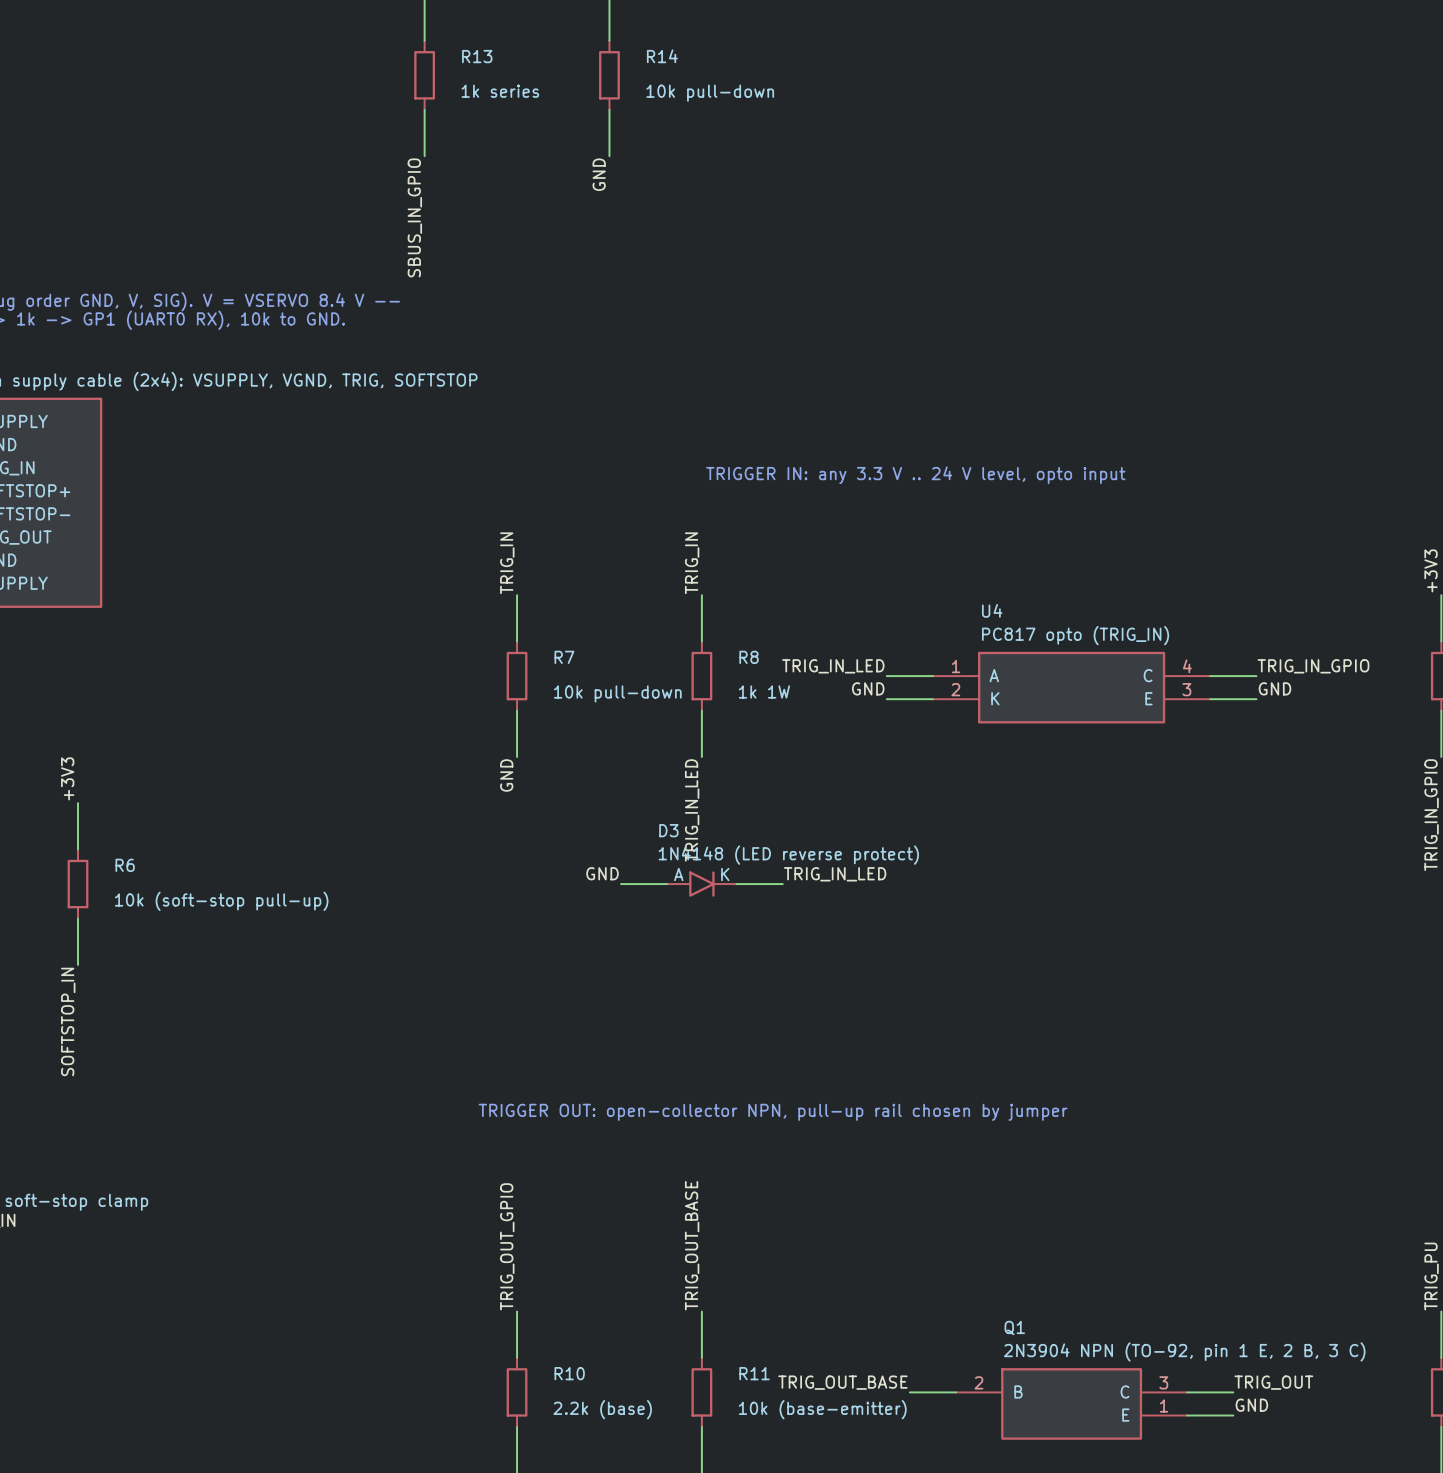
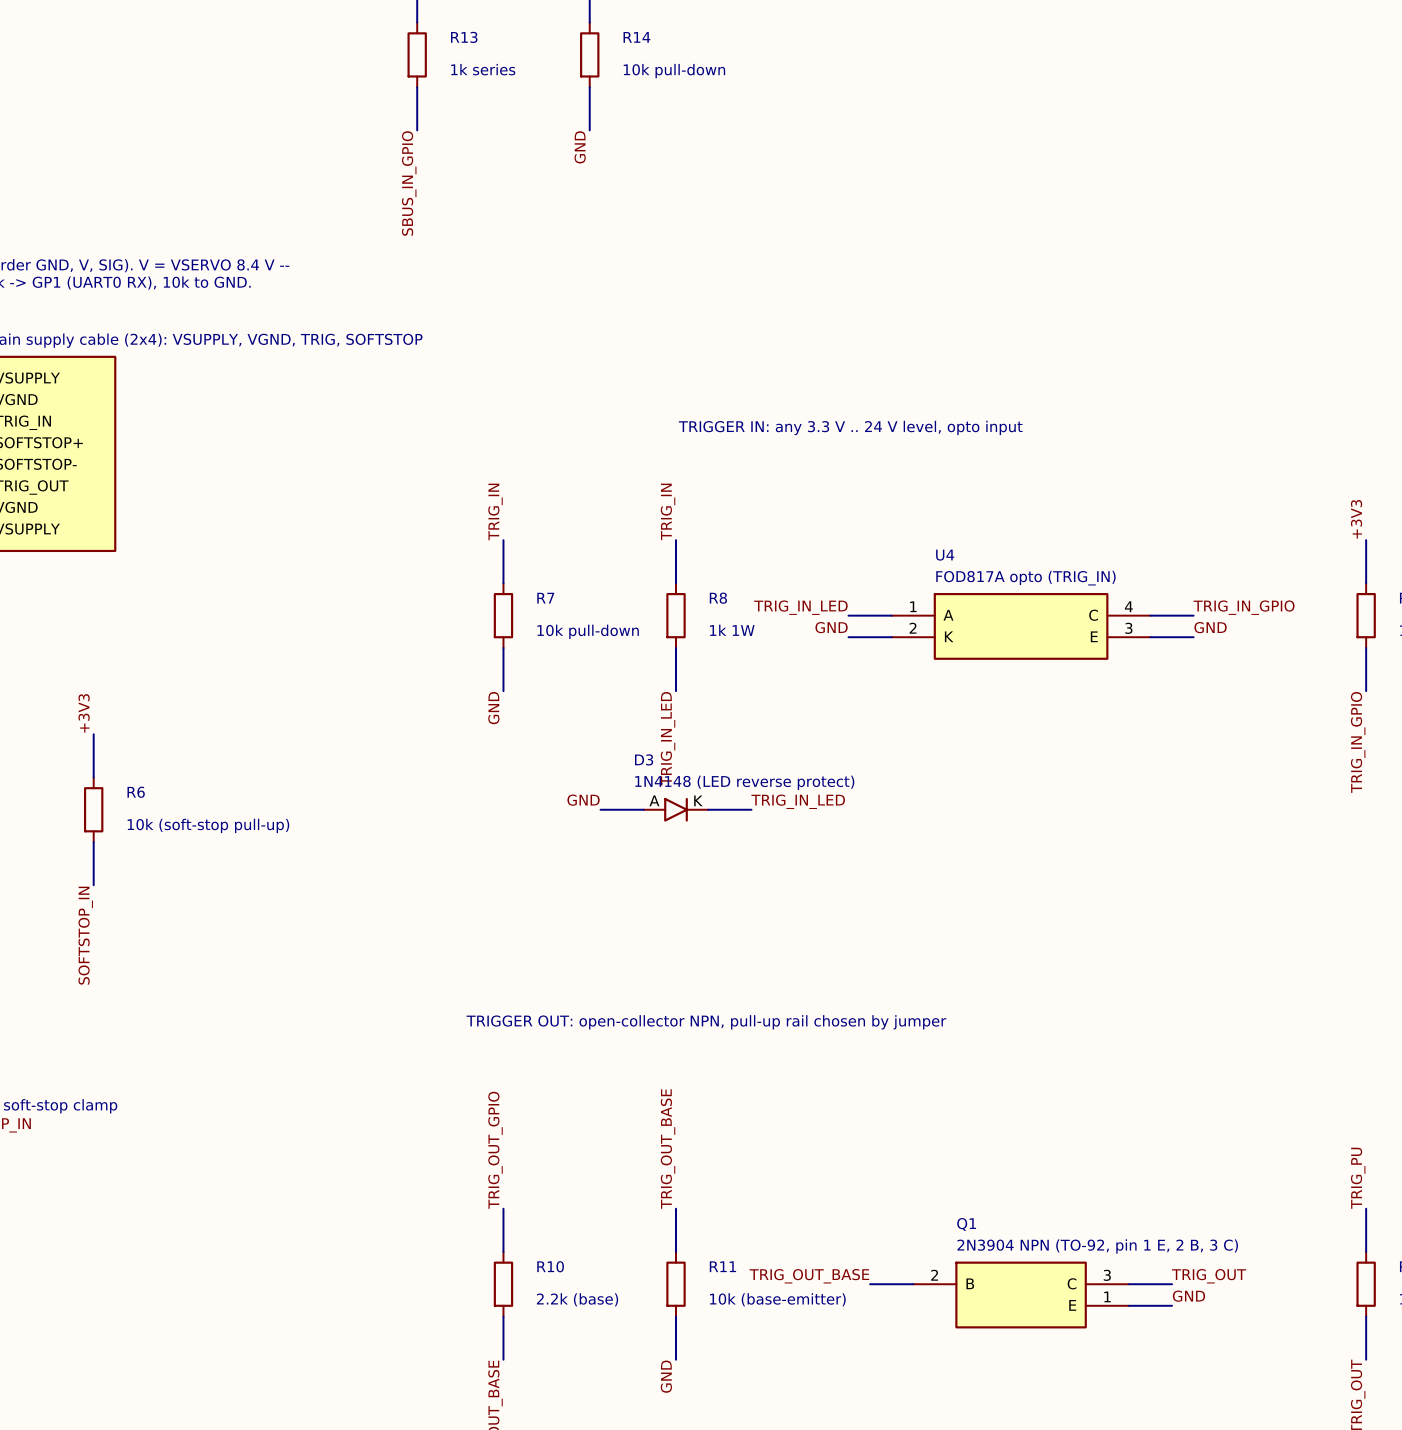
U4 value: PC817 opto (TRIG_IN) (1075, 635) -> FOD817A opto (TRIG_IN) (1025, 578)

